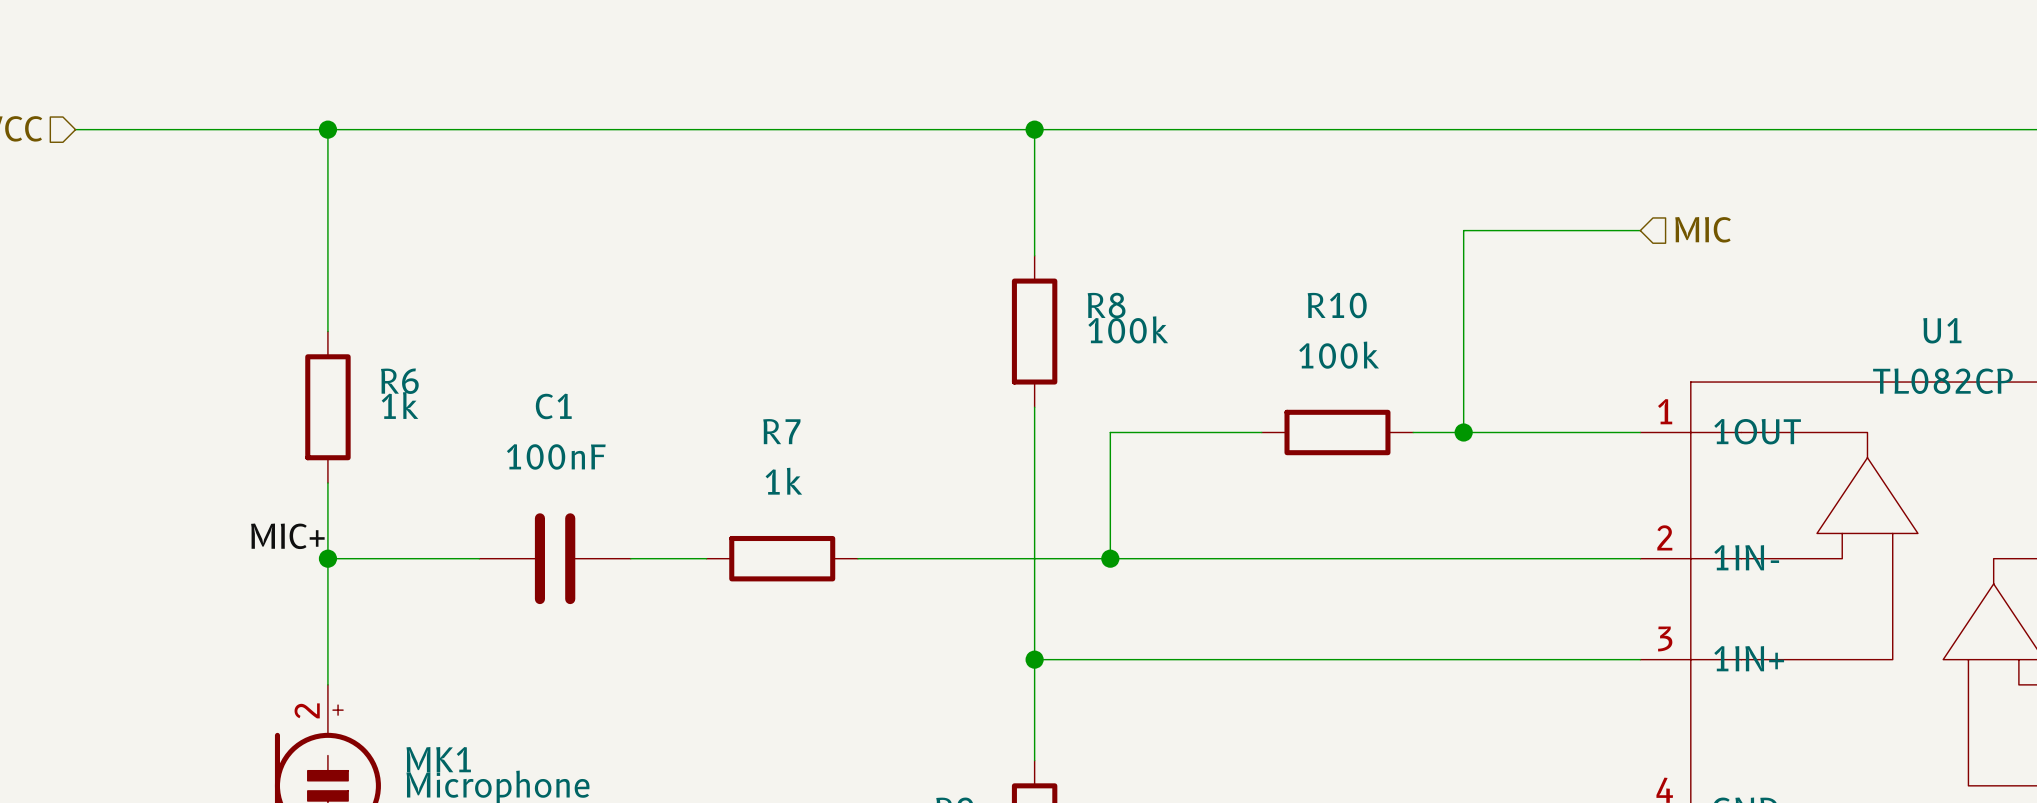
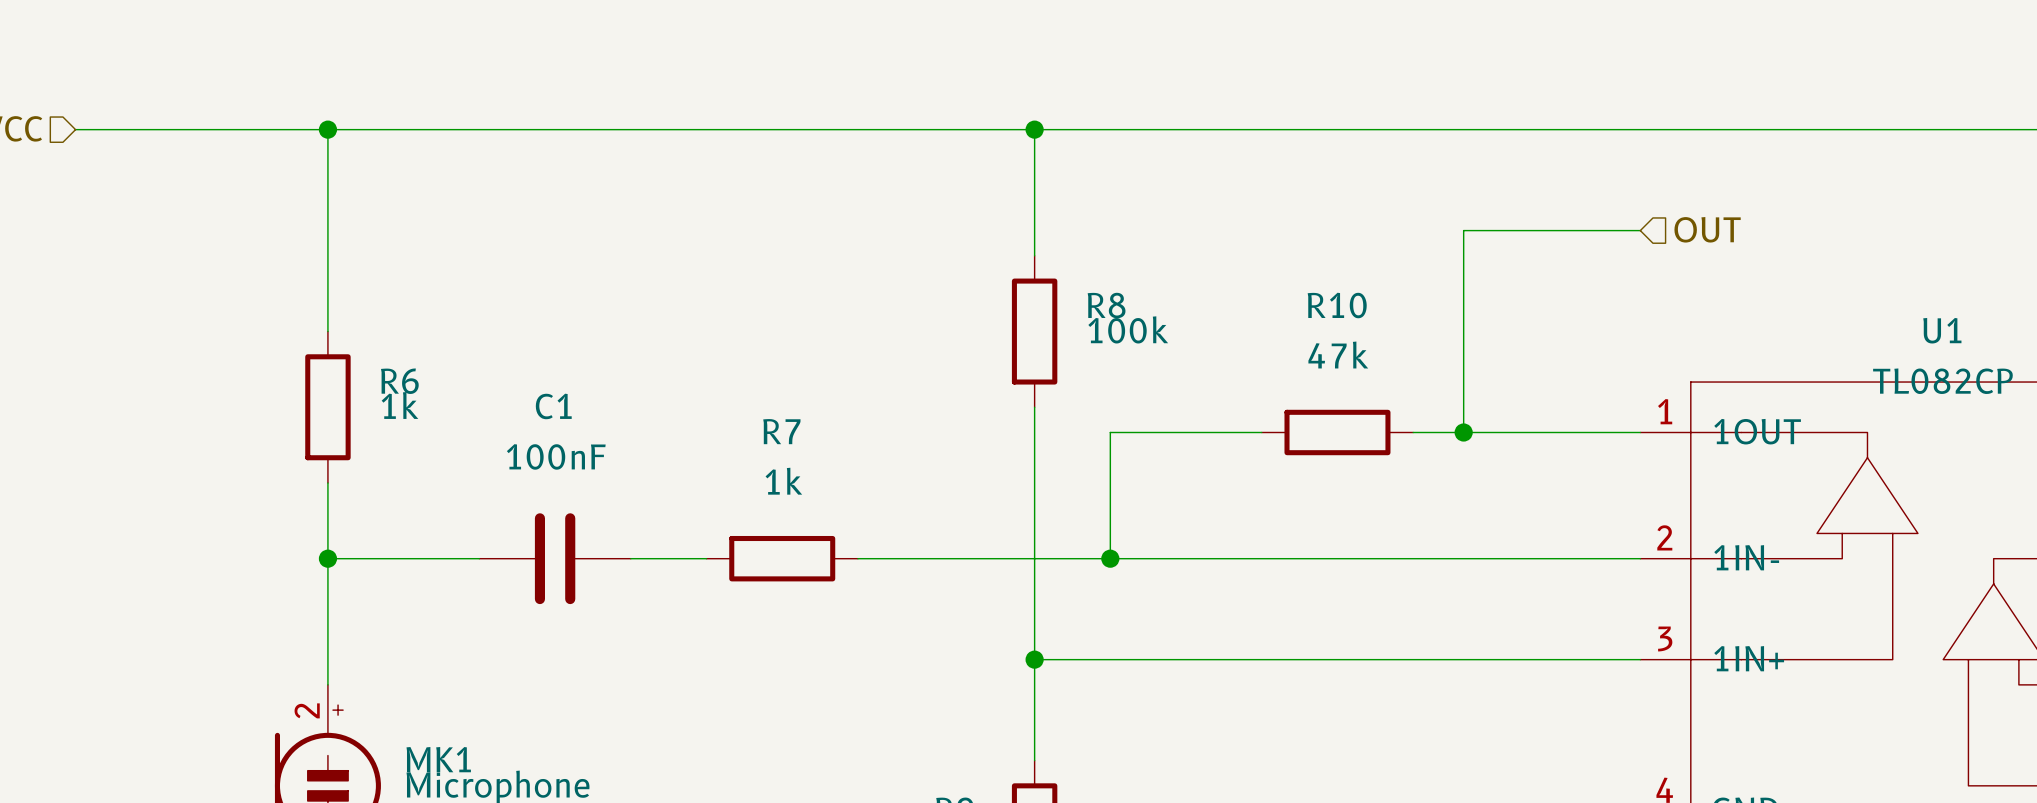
hierarchical label: MIC (1703, 229) -> OUT (1707, 229)
R10 value: 100k (1339, 355) -> 47k (1338, 355)
label: MIC+ (287, 536) -> none

